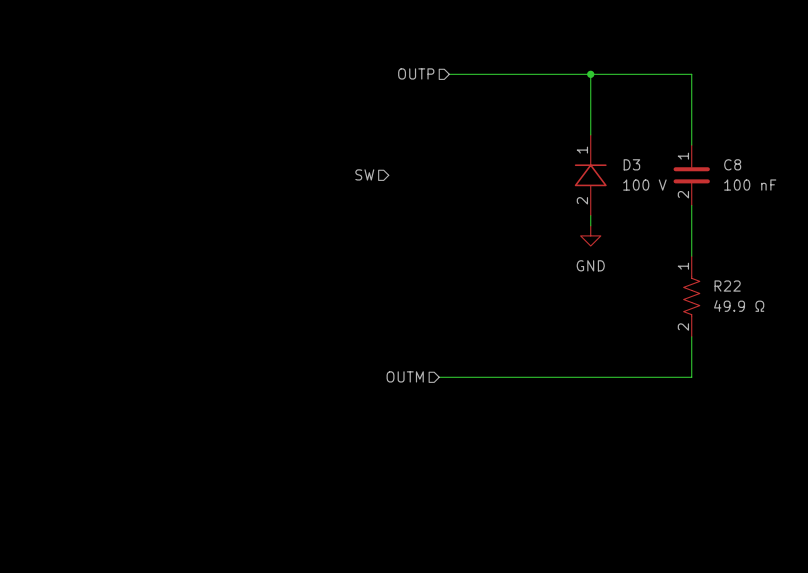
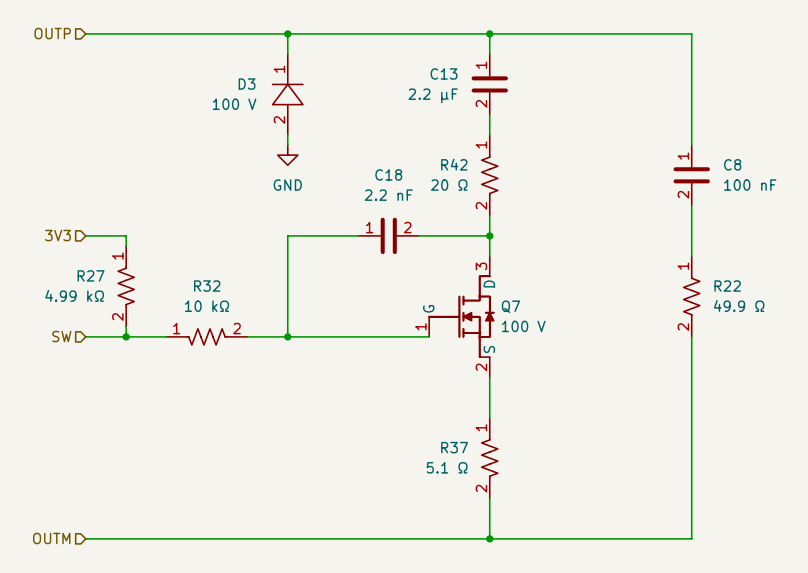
hierarchical label: none -> OUTP (52, 33)
wire: none -> (287, 33) (287, 54)
junction: none -> (287, 33)
wire: none -> (489, 33) (489, 54)
junction: none -> (489, 33)
hierarchical label: OUTP (416, 73) -> none
wire: (449, 74) (691, 74) -> (85, 33) (691, 33) (691, 74)
wire: (590, 74) (590, 134) -> none
junction: (590, 74) -> none
C13: none -> 2.2 µF (489, 84)
wire: none -> (489, 114) (489, 134)
wire: none -> (287, 134) (287, 145)
power symbol: none -> GND (287, 155)
D3 name position: D3 (631, 164) -> D3 (247, 84)
hierarchical label: SW (364, 174) -> none
R42: none -> 20 Ω (489, 175)
D3 position: (590, 175) -> (287, 94)
D3 value position: 100 V (644, 185) -> 100 V (234, 104)
wire: none -> (489, 215) (489, 256)
wire: (590, 215) (590, 225) -> none
hierarchical label: none -> 3V3 (57, 235)
wire: none -> (85, 235) (126, 235) (126, 246)
wire: none -> (358, 235) (287, 235) (287, 336)
C18: none -> 2.2 nF (388, 235)
wire: none -> (419, 235) (489, 235)
junction: none -> (489, 235)
power symbol: GND (590, 235) -> none
R27: none -> 4.99 kΩ (126, 286)
Q7: none -> 100 V (461, 316)
wire: none -> (126, 326) (126, 336)
hierarchical label: none -> SW (61, 336)
wire: none -> (85, 336) (166, 336)
junction: none -> (126, 336)
R32: none -> 10 kΩ (206, 336)
wire: none -> (247, 336) (429, 336)
junction: none -> (287, 336)
hierarchical label: OUTM (405, 376) -> none
wire: (439, 377) (691, 377) -> (85, 538) (691, 538) (691, 377)
wire: none -> (489, 377) (489, 417)
R37: none -> 5.1 Ω (489, 458)
wire: none -> (489, 498) (489, 538)
hierarchical label: none -> OUTM (51, 538)
junction: none -> (489, 538)

